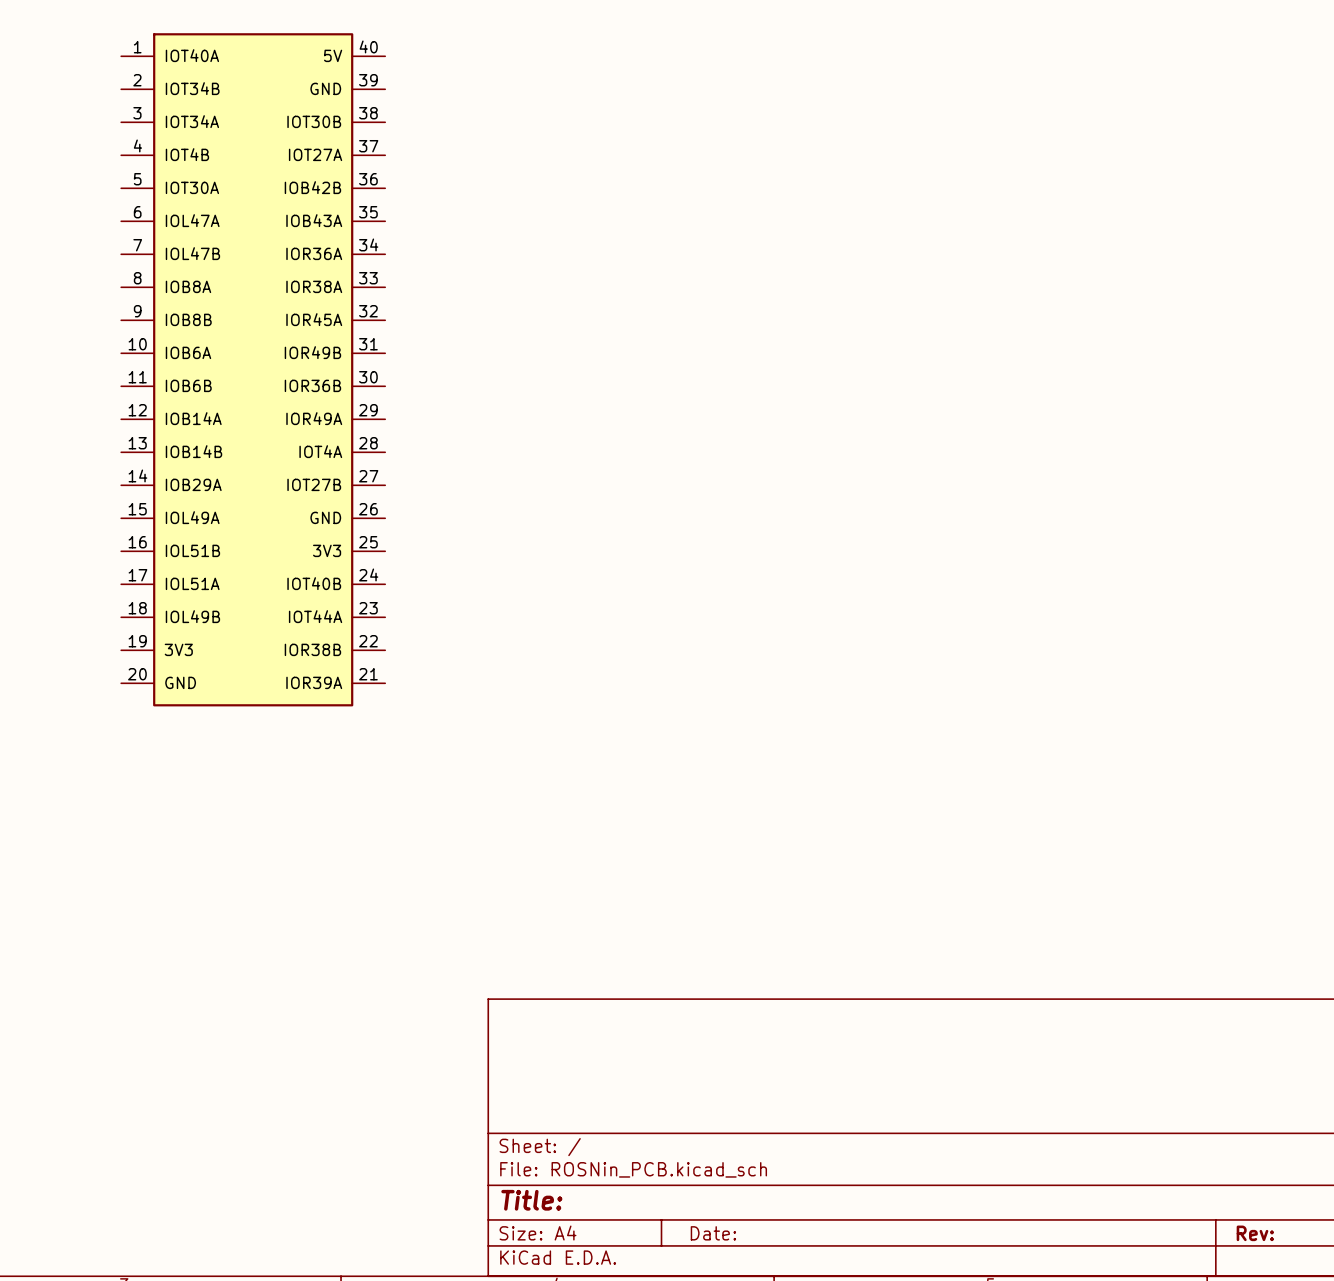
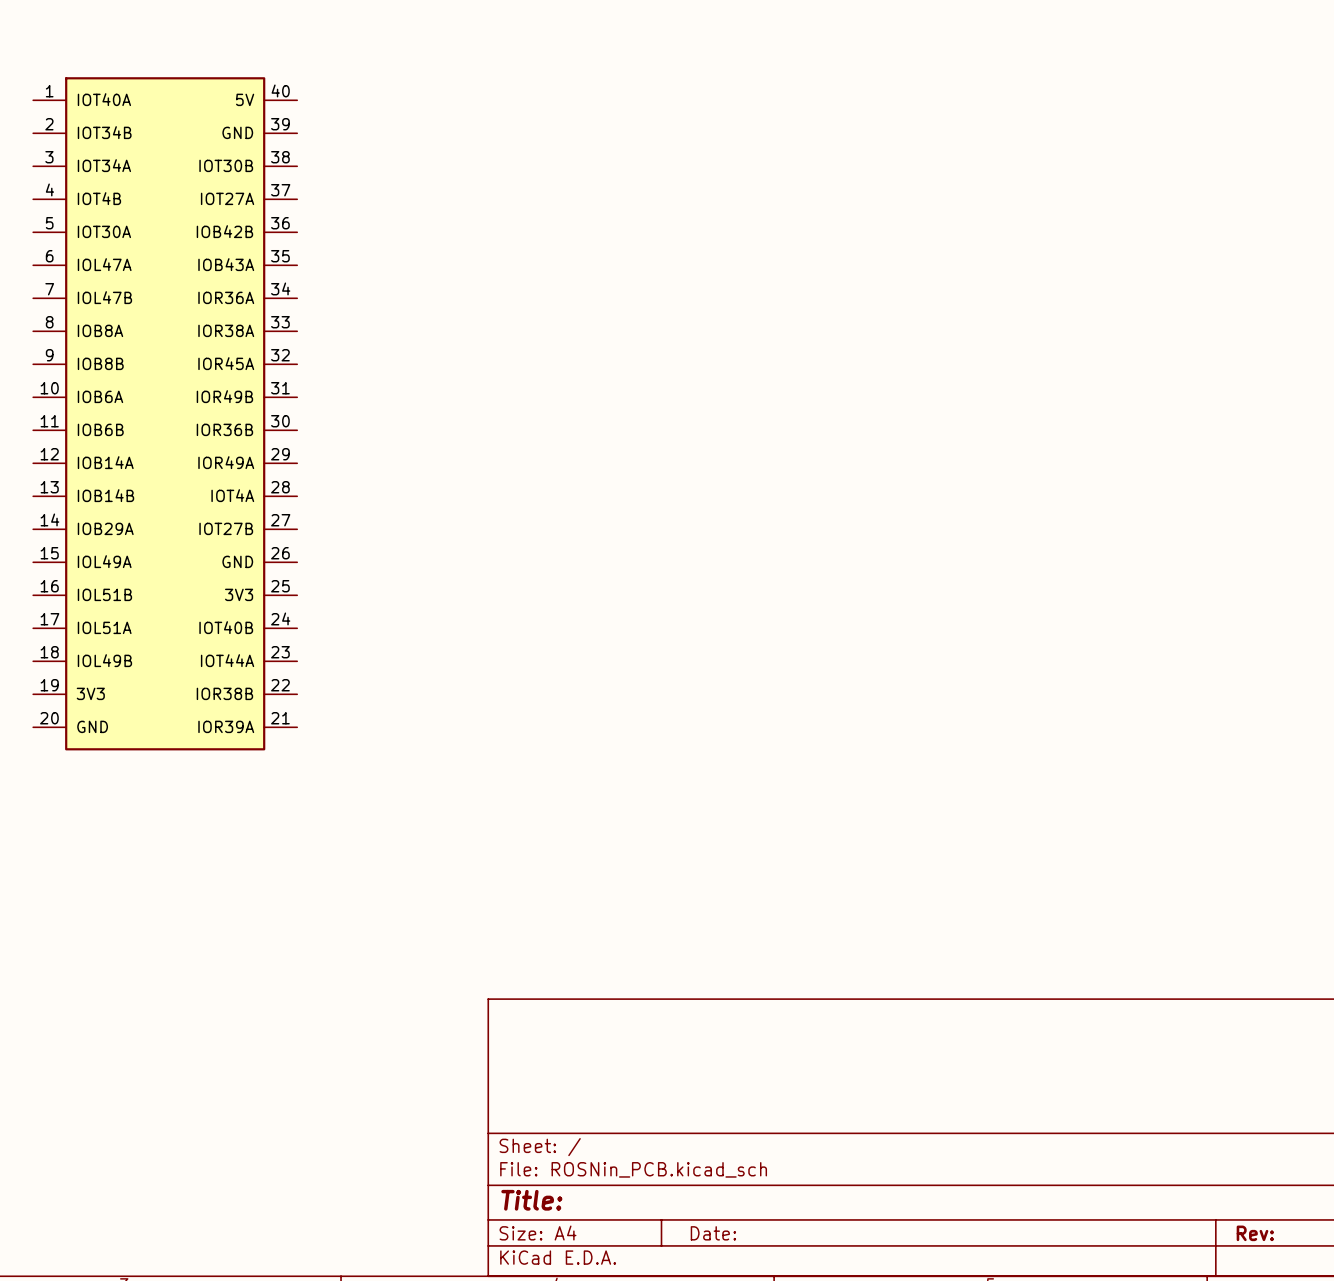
part position: (253, 369) -> (165, 413)

